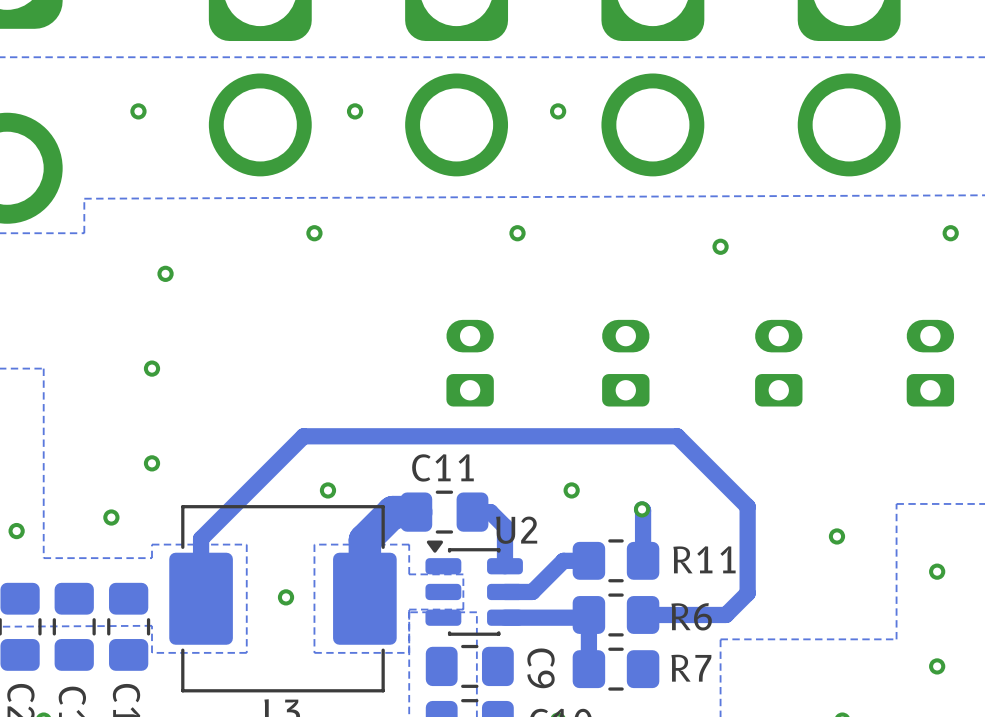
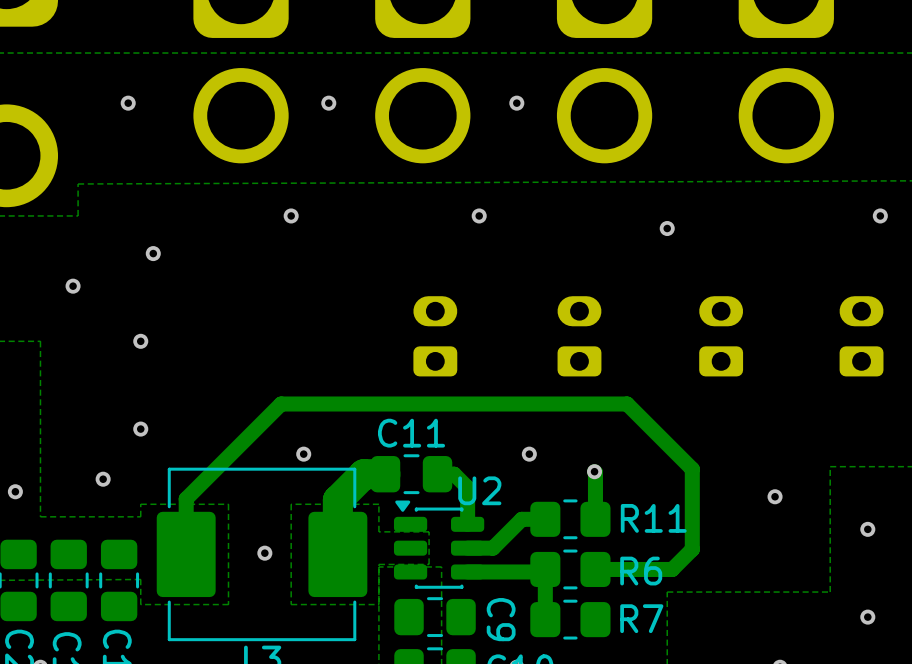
via: none -> (73, 286)

